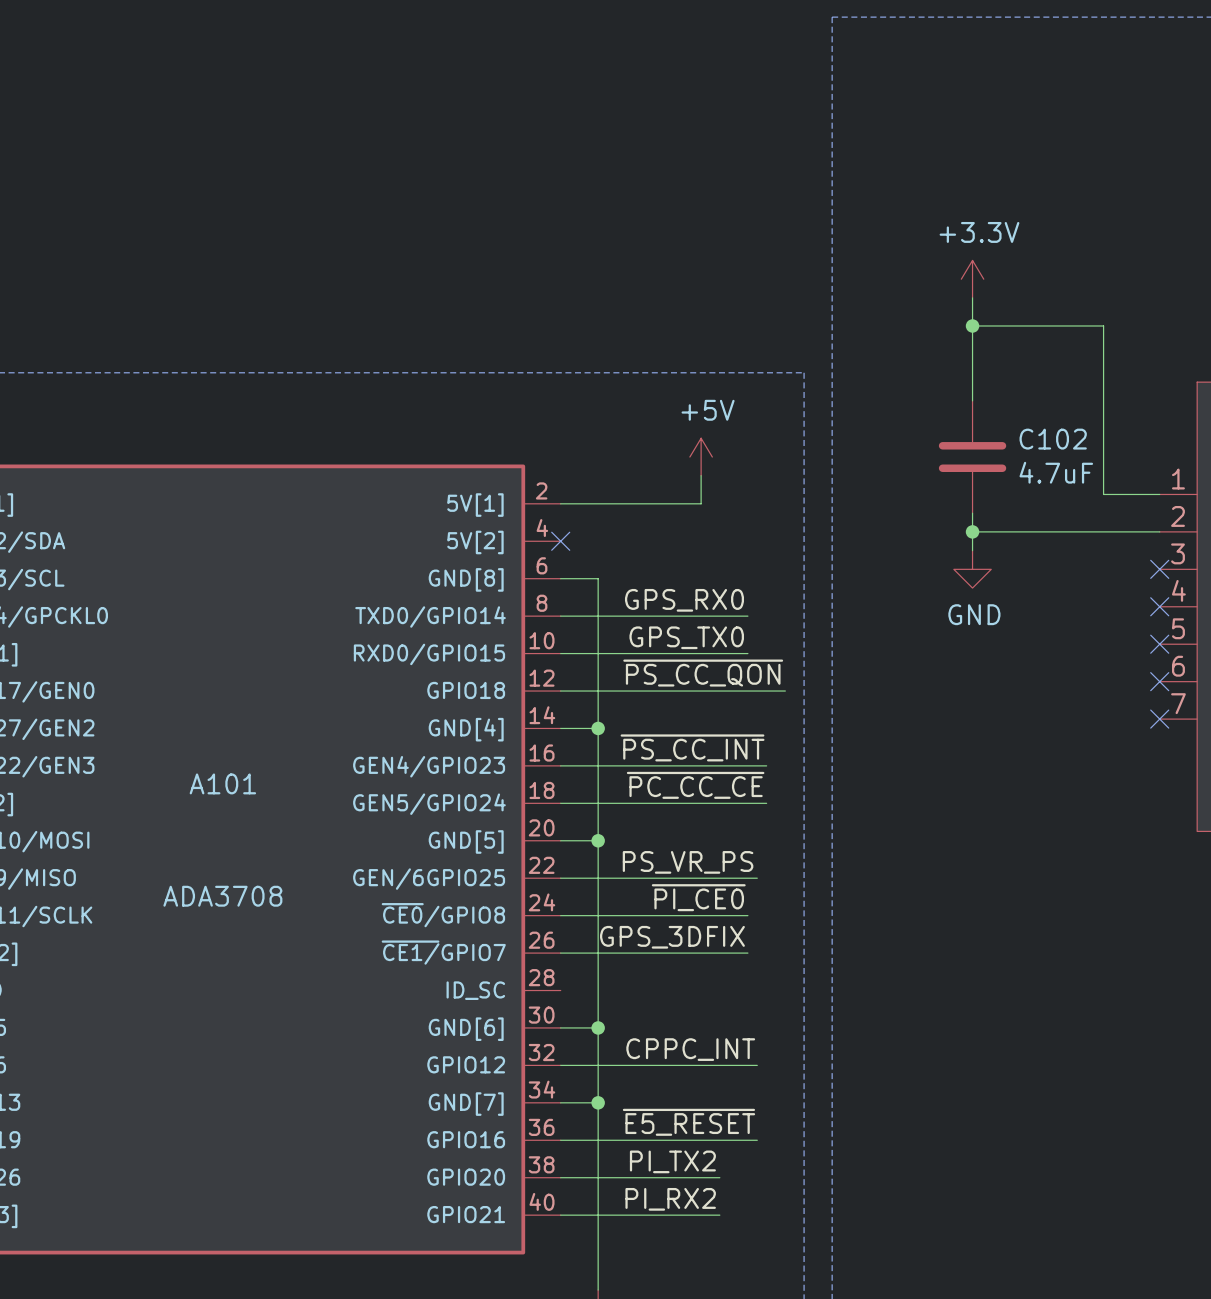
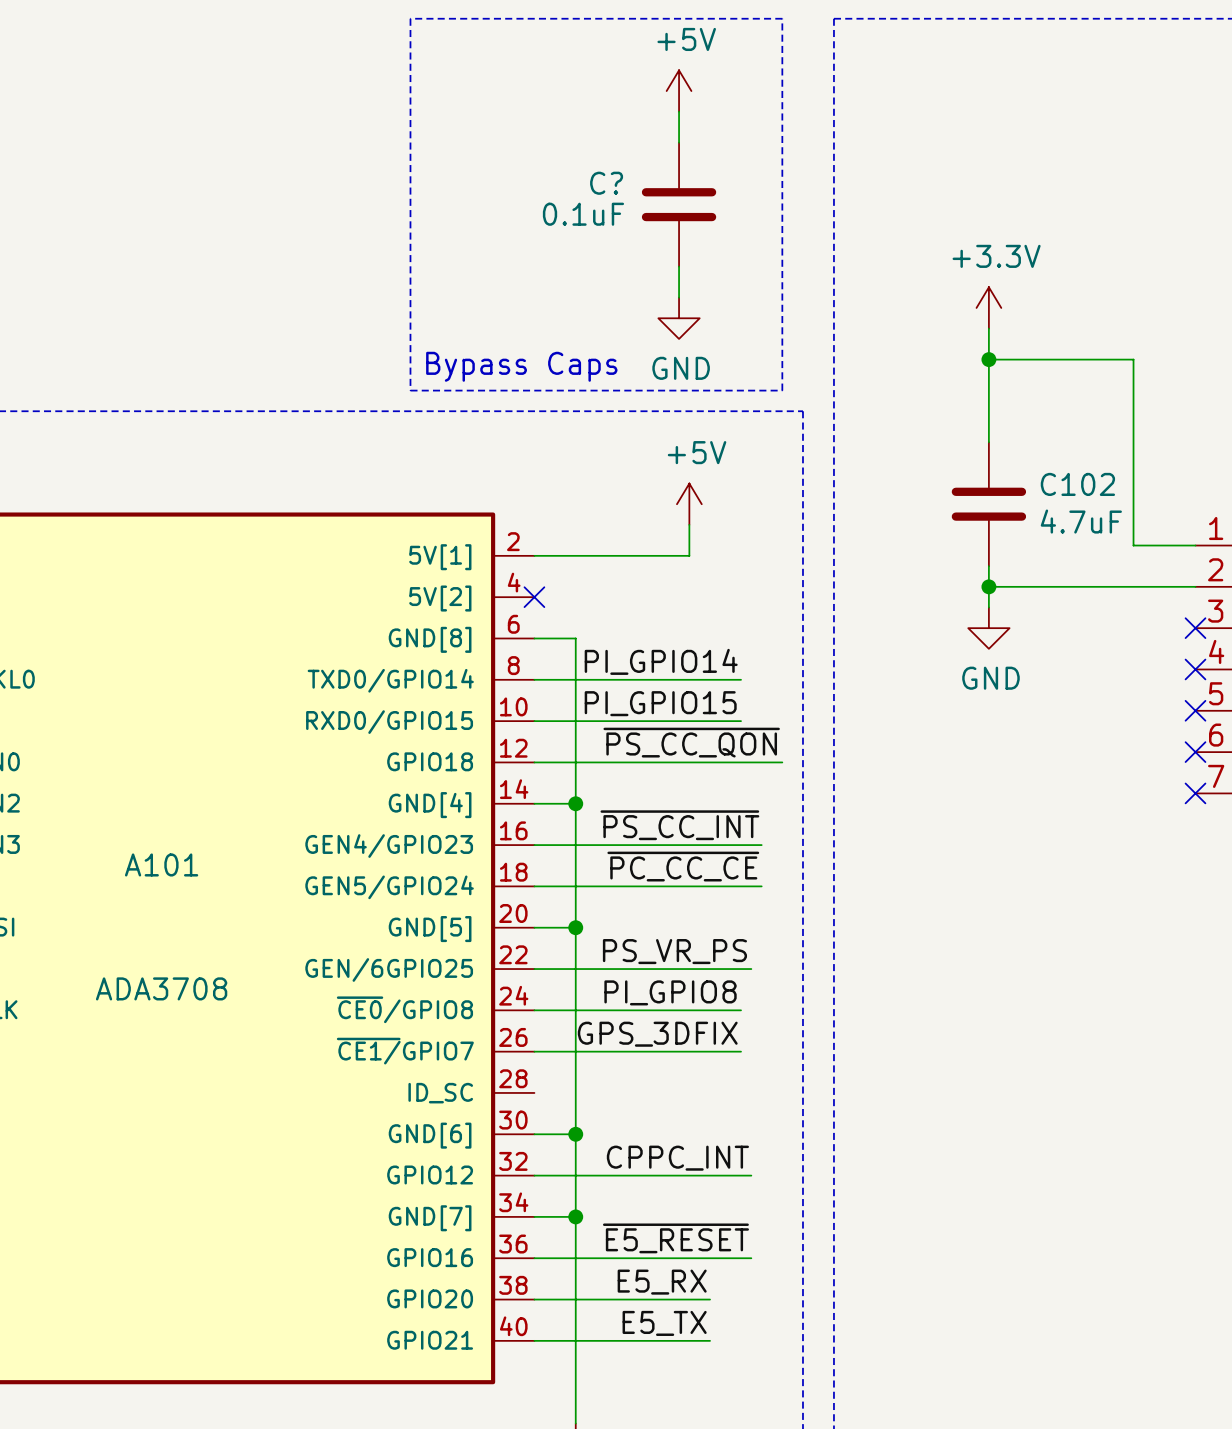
line: none -> (410, 18) (782, 18) (782, 390) (410, 390) (410, 18)
power symbol: none -> +5V (679, 91)
wire: none -> (679, 111) (679, 142)
C?: none -> 0.1uF (679, 204)
wire: none -> (679, 266) (679, 297)
power symbol: none -> GND (679, 318)
text: none -> Bypass Caps (521, 366)
label: GPS_RX0 (684, 600) -> PI_GPIO14 (661, 661)
label: GPS_TX0 (686, 637) -> PI_GPIO15 (660, 703)
label: ~{PI_CE0} (698, 897) -> PI_GPIO8 (670, 992)
label: PI_TX2 (672, 1161) -> E5_RX (662, 1282)
label: PI_RX2 (670, 1199) -> E5_TX (664, 1323)

